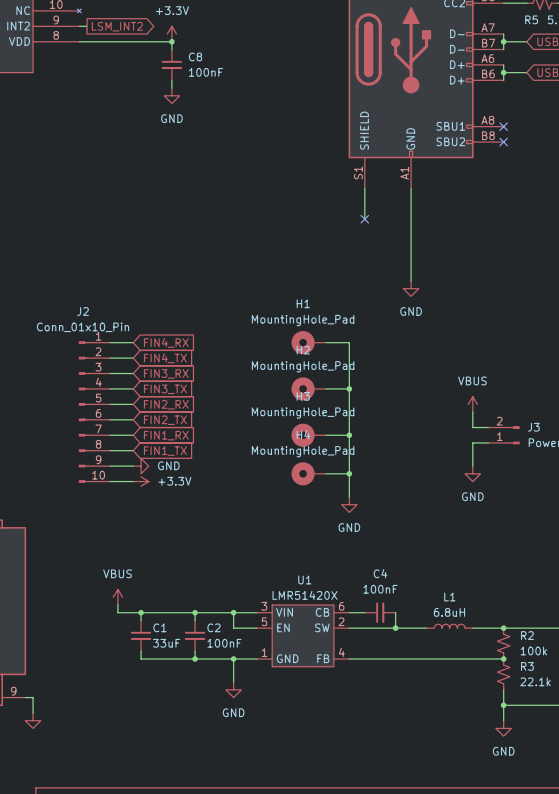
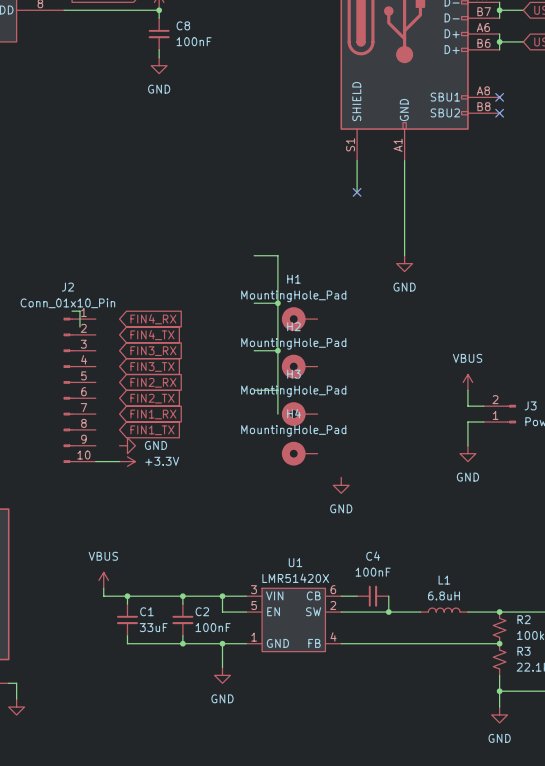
junction: none -> (277, 303)
wire: none -> (72, 311) (79, 311) (79, 326)
wire: (110, 342) (133, 342) -> none
wire: (326, 342) (349, 342) (349, 496) -> (254, 255) (277, 255) (277, 414)
wire: (110, 358) (133, 358) -> none
wire: (110, 373) (133, 373) -> none
junction: none -> (277, 350)
wire: (110, 388) (133, 388) -> none
wire: (326, 388) (349, 388) -> (254, 303) (277, 303)
junction: (349, 388) -> none
wire: (110, 404) (133, 404) -> none
wire: (110, 419) (133, 419) -> none
wire: (110, 435) (133, 435) -> none
wire: (326, 435) (349, 435) -> (254, 350) (277, 350)
junction: (349, 435) -> none
wire: (110, 450) (133, 450) -> none
wire: (110, 466) (133, 466) -> none
wire: (326, 473) (349, 473) -> (254, 390) (277, 390)
junction: (349, 473) -> none

